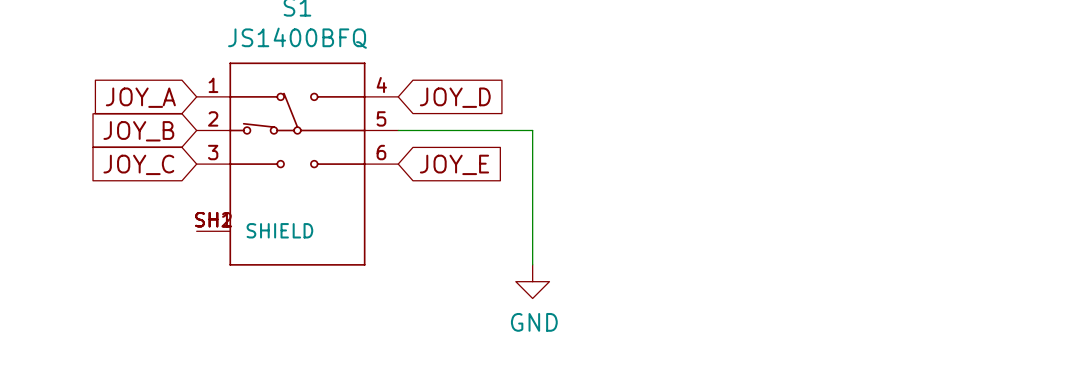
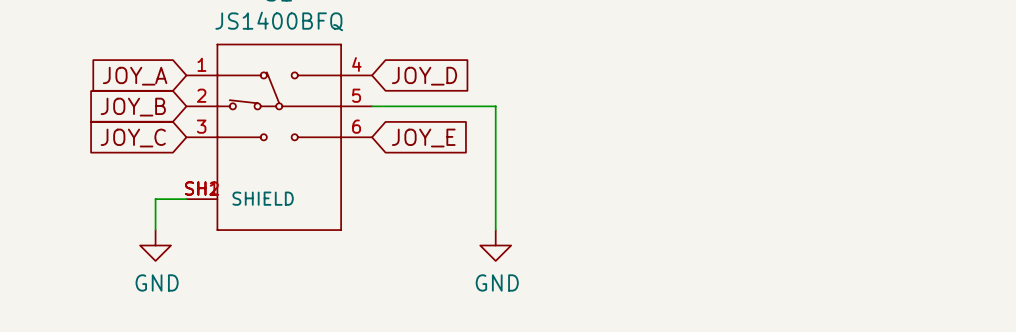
wire: none -> (186, 199) (155, 199) (155, 230)
power symbol: none -> GND (155, 245)

